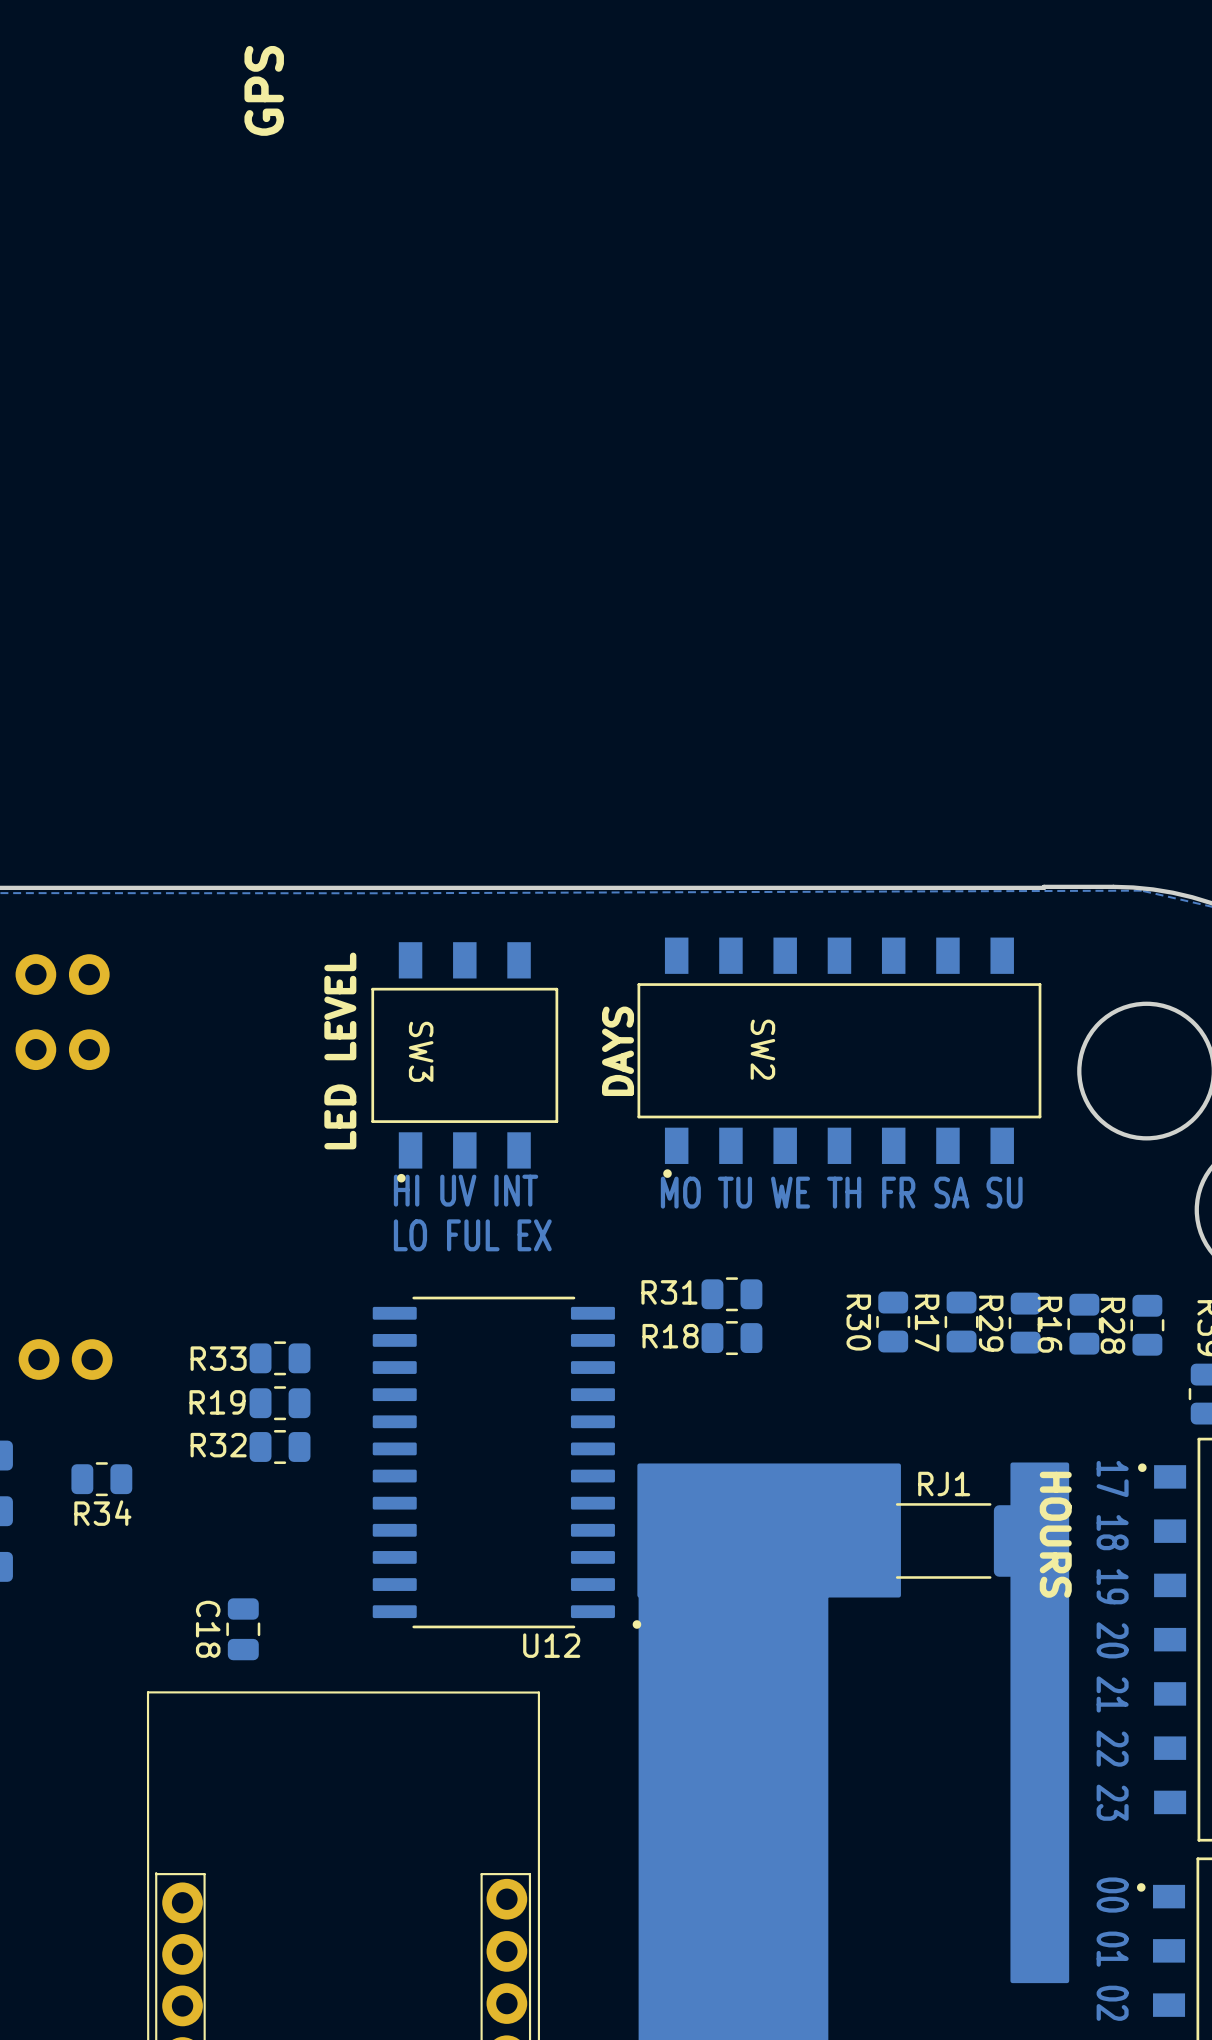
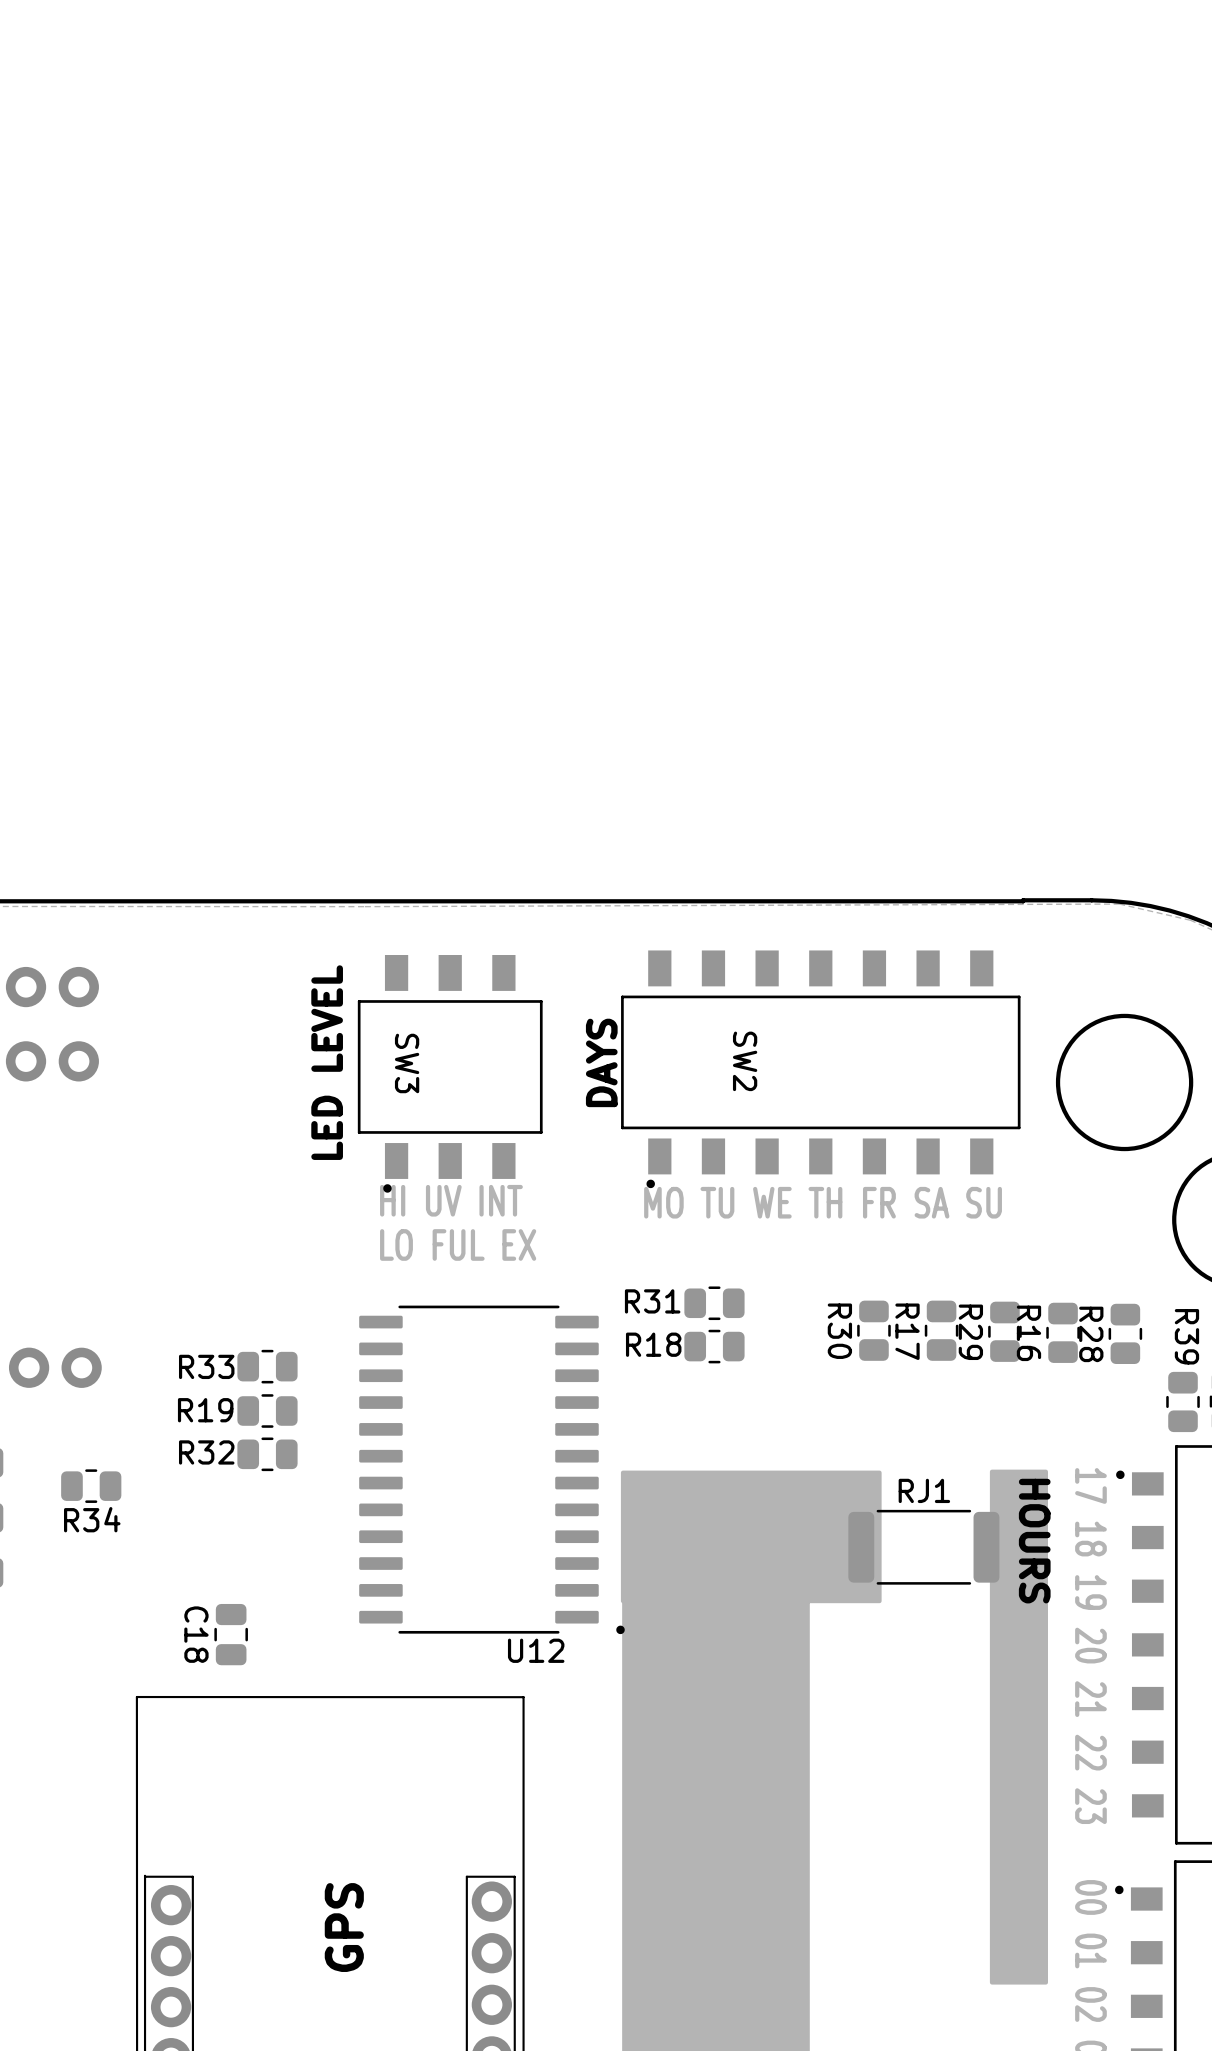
text: GPS (264, 90) -> none
text: none -> GPS (344, 1927)

